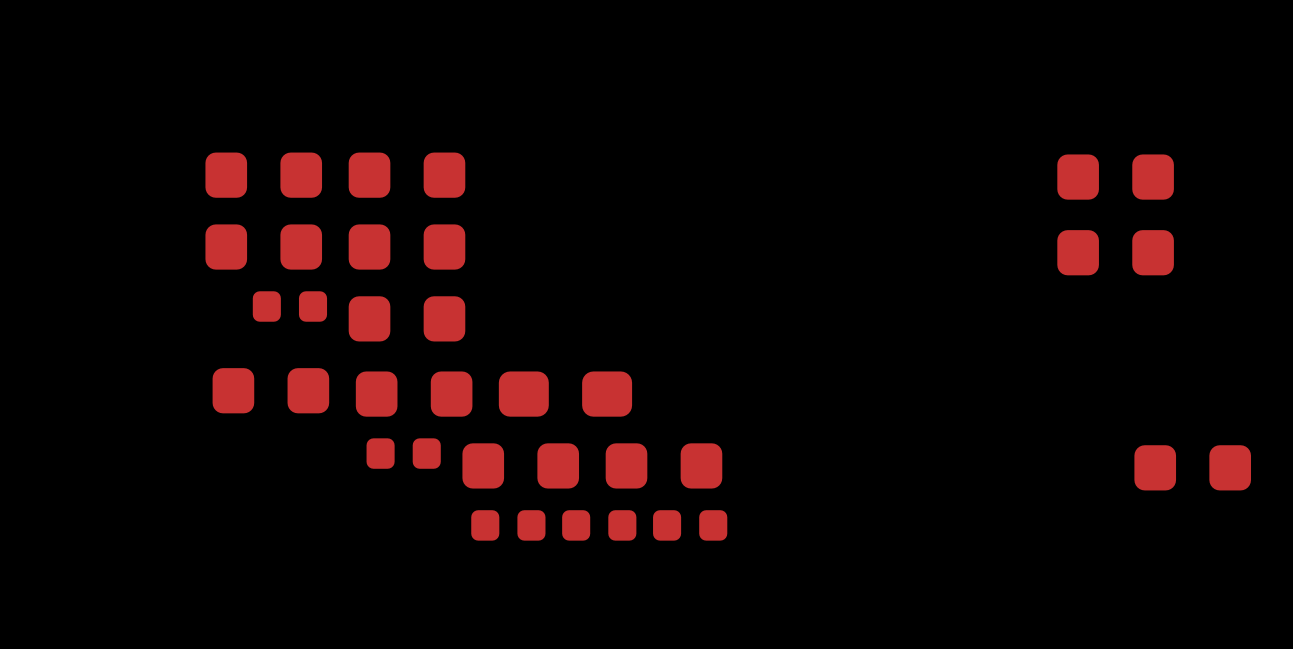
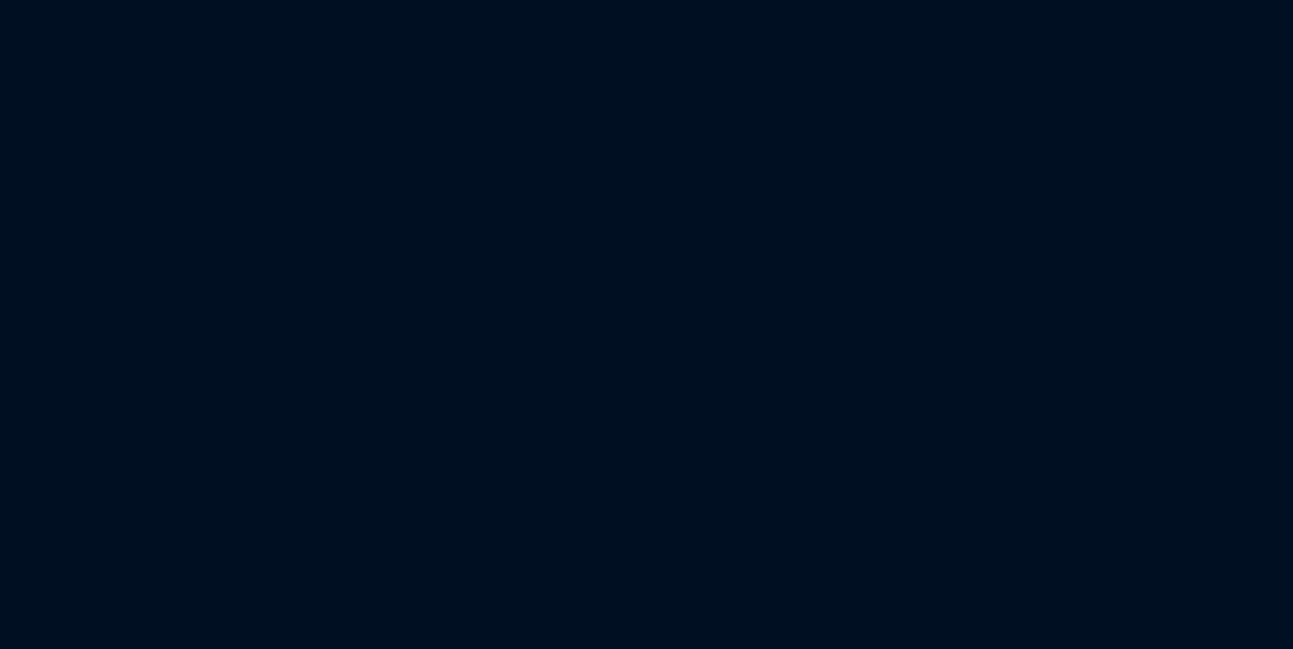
part: (263, 175) -> none
part: (406, 175) -> none
part: (1115, 177) -> none
part: (263, 247) -> none
part: (406, 247) -> none
part: (1115, 252) -> none
part: (289, 306) -> none
part: (406, 318) -> none
part: (270, 390) -> none
part: (414, 394) -> none
part: (565, 394) -> none
part: (403, 453) -> none
part: (520, 465) -> none
part: (663, 465) -> none
part: (1192, 467) -> none
part: (508, 525) -> none
part: (599, 525) -> none
part: (690, 525) -> none

